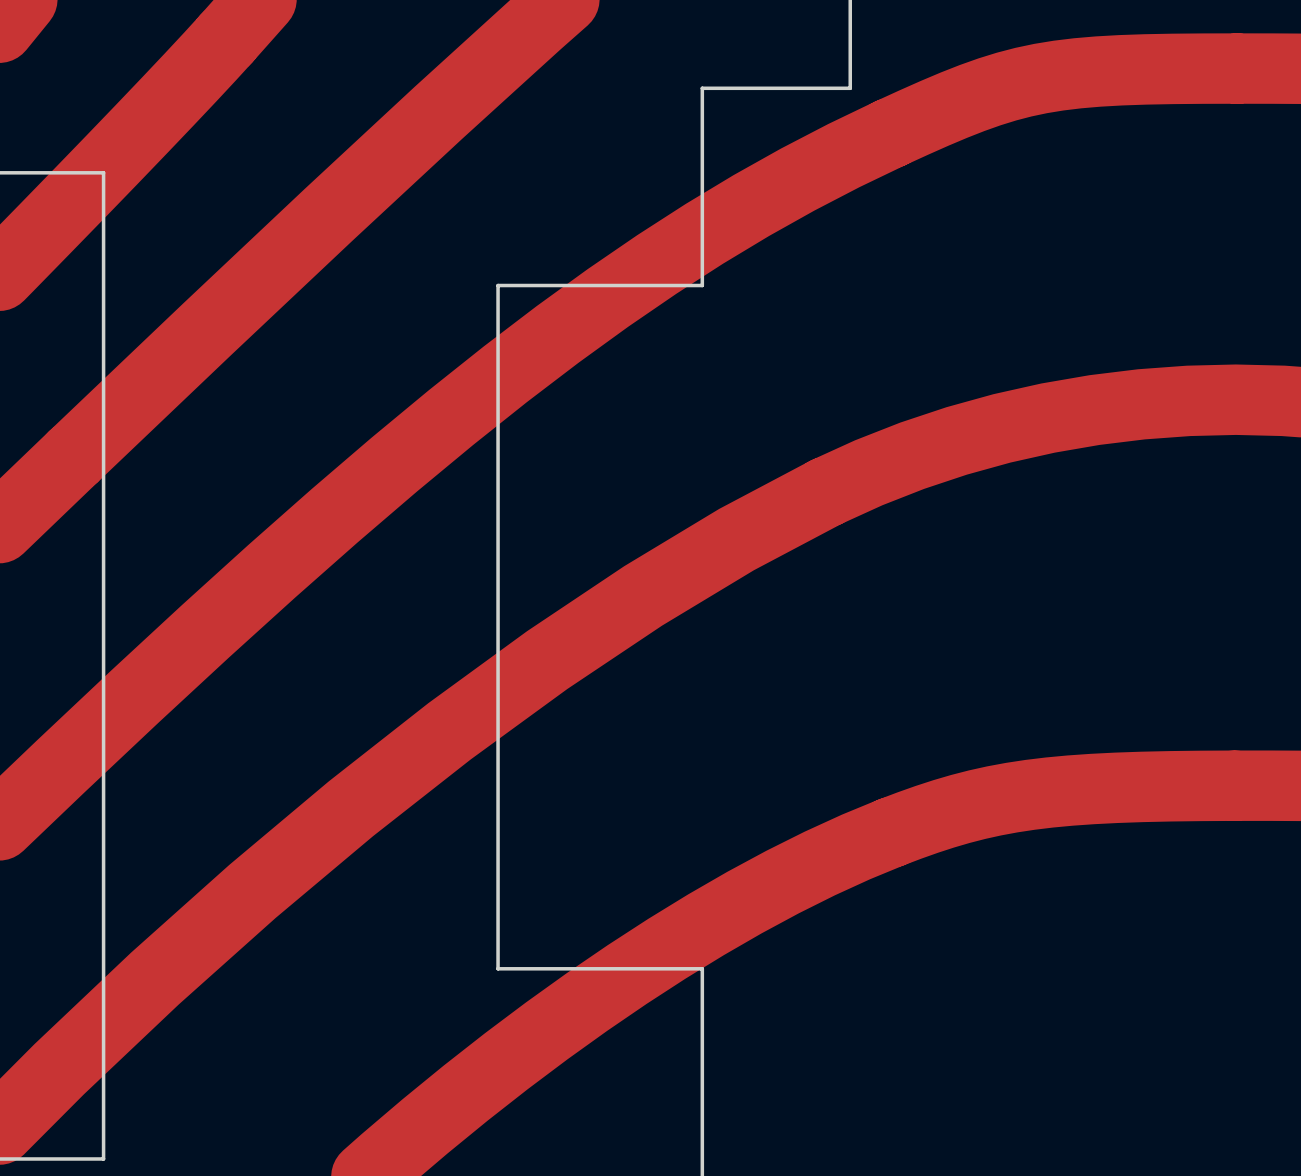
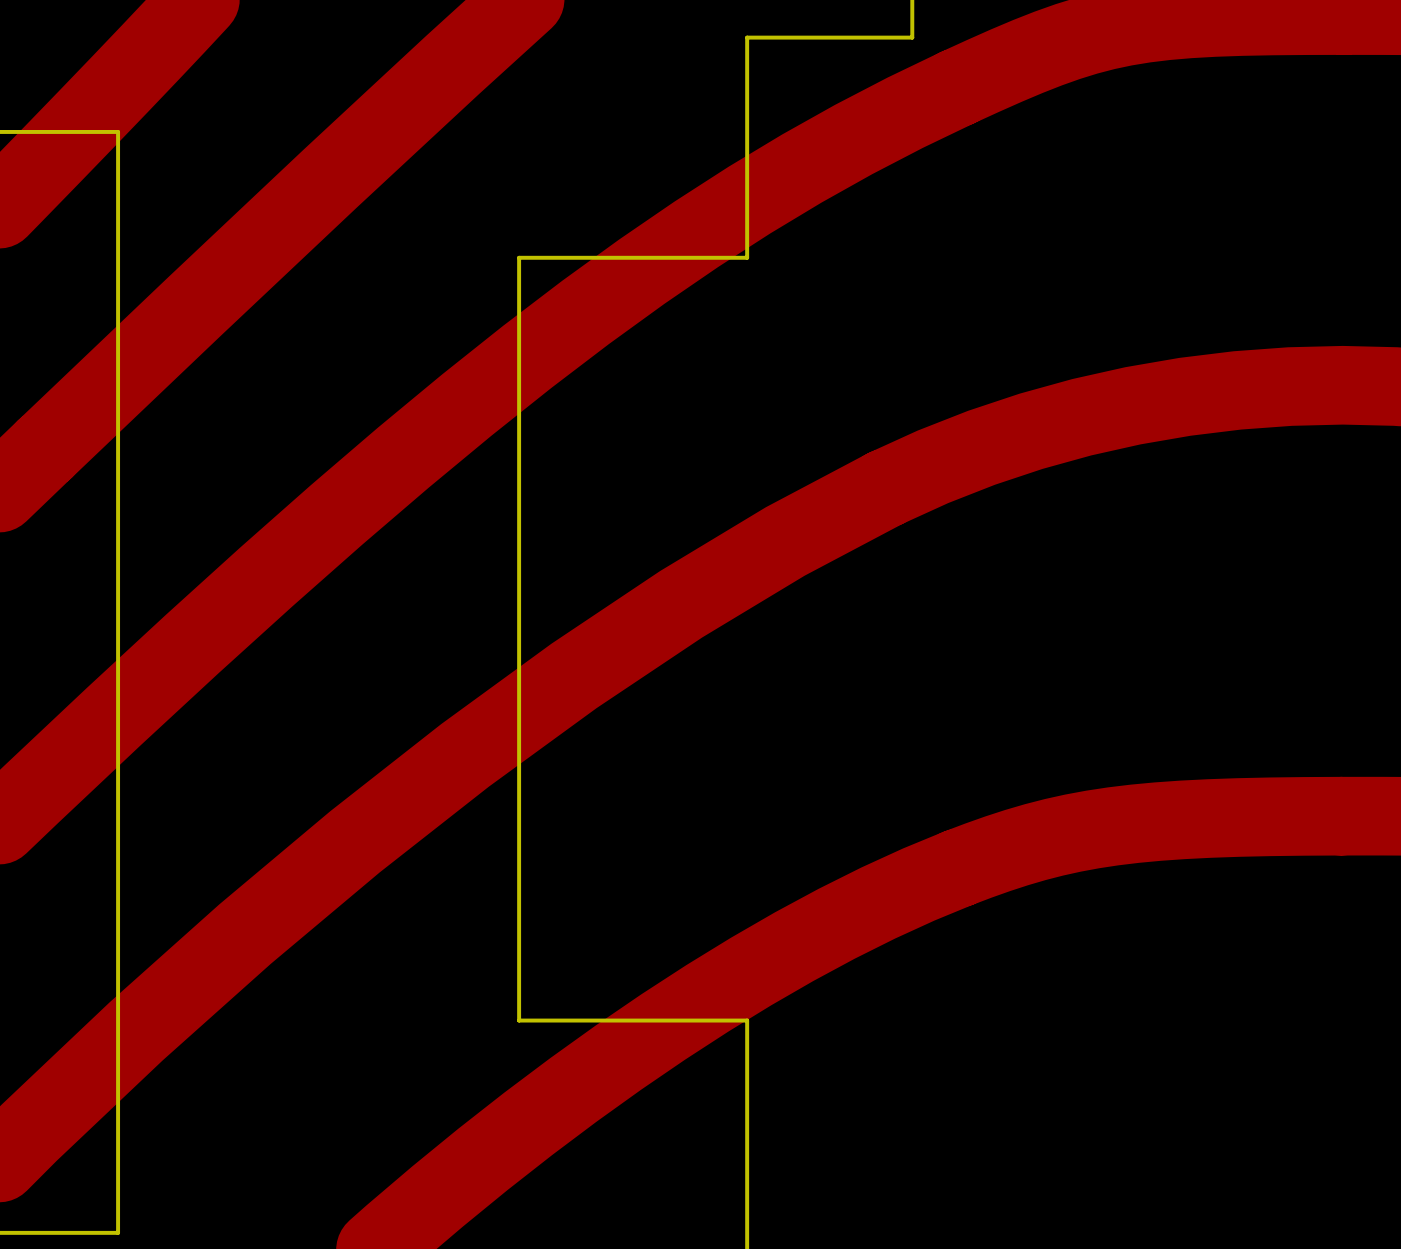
board edge: (103, 172) (103, 1158) -> (78, 131) (118, 131) (118, 1232) (78, 1232)

